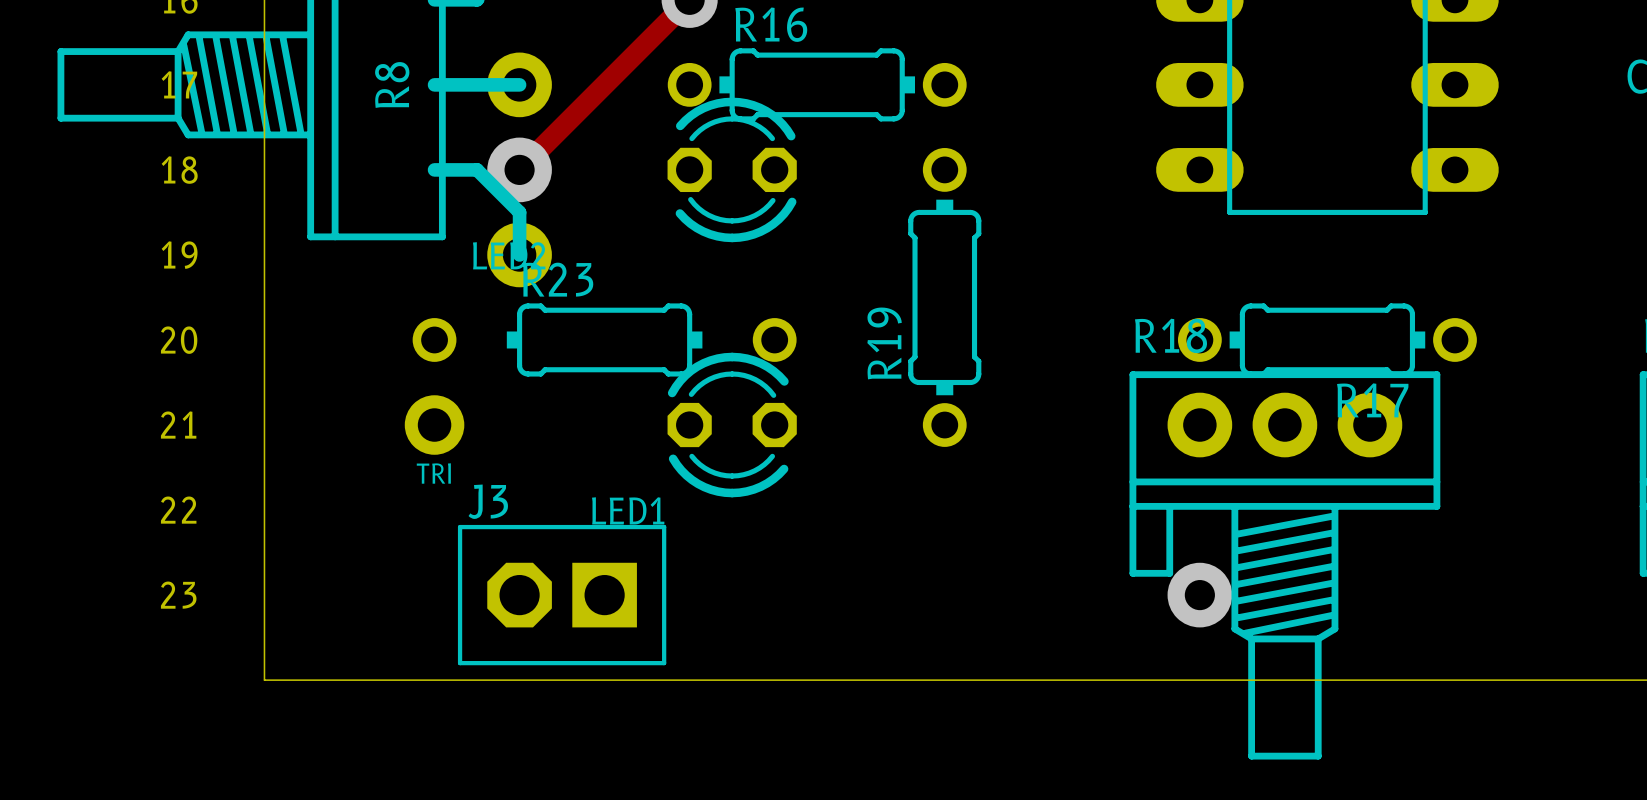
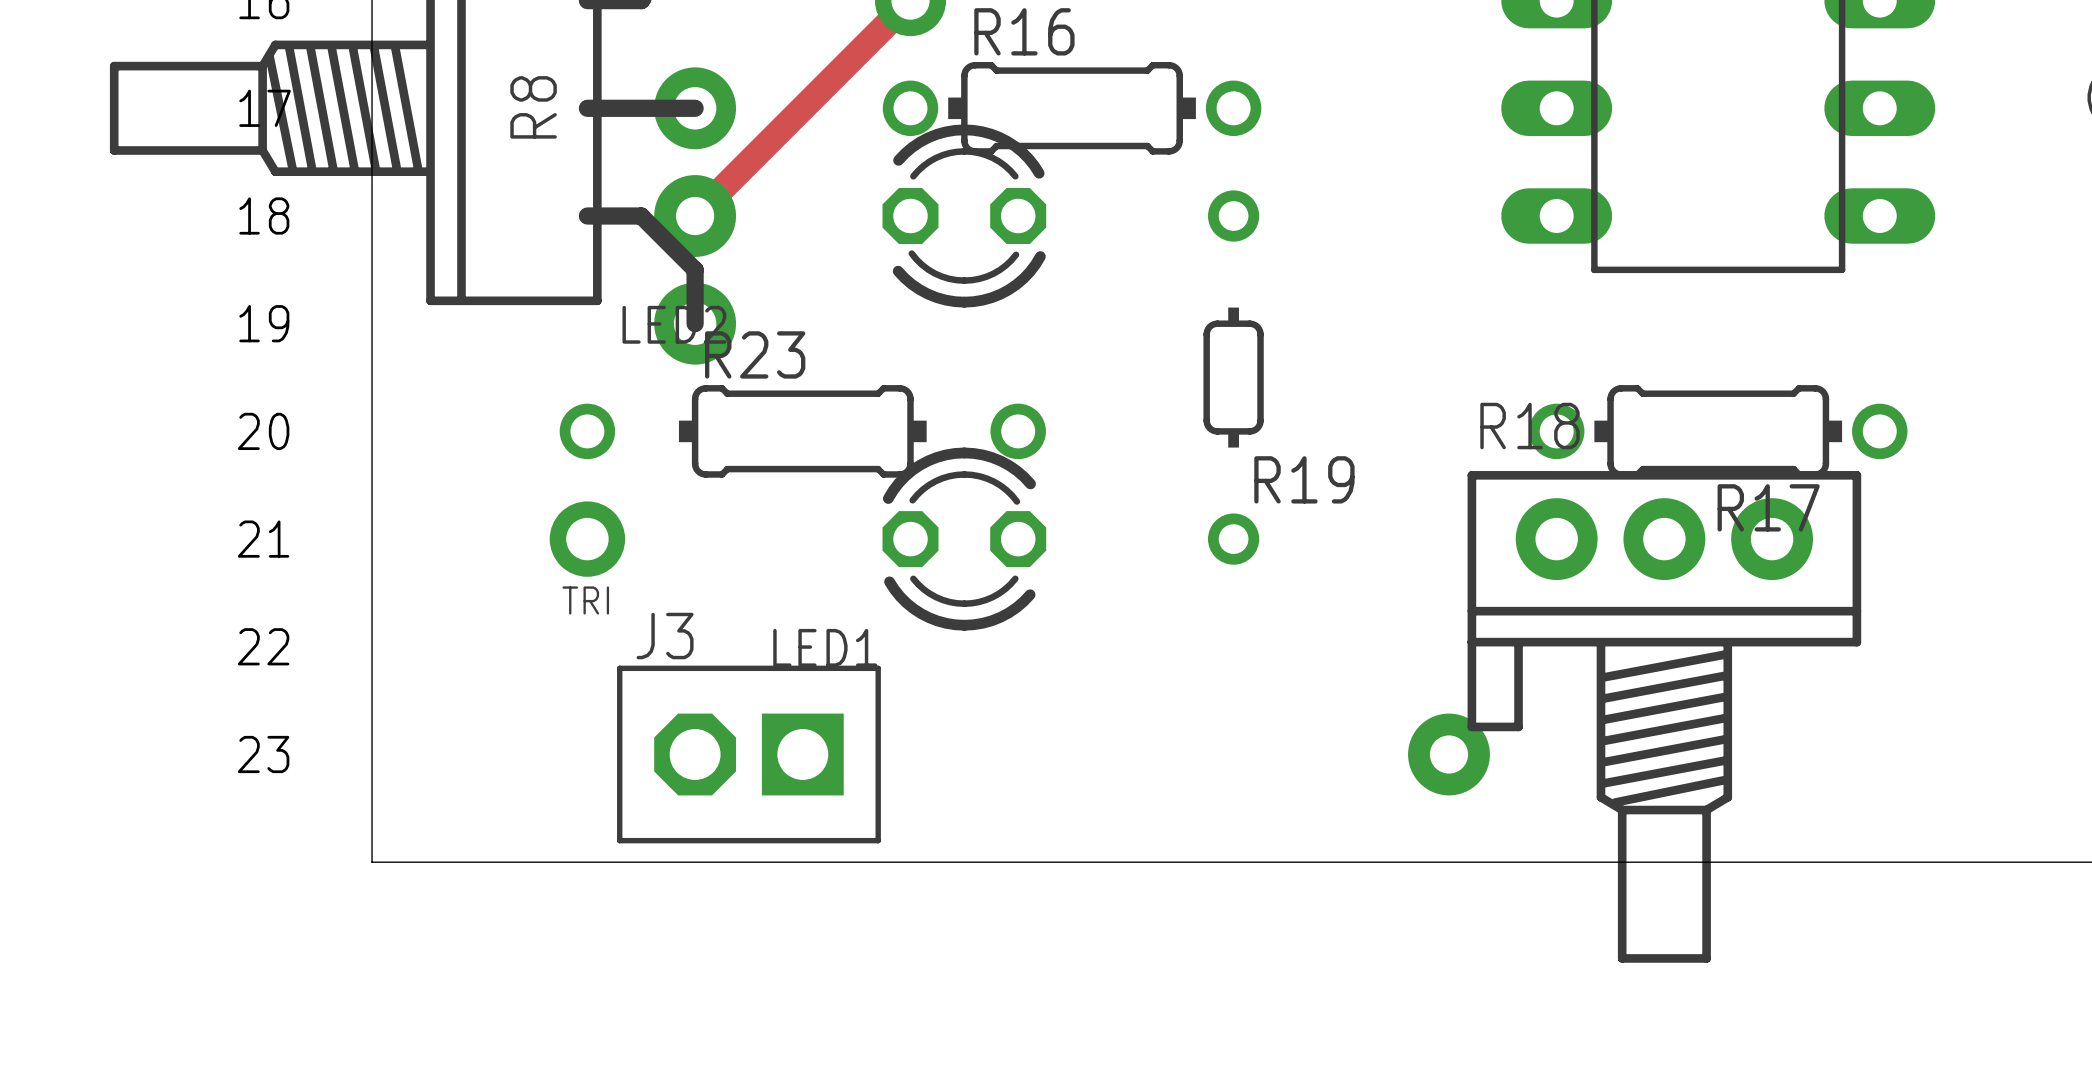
R19 footprint: [908, 148, 982, 447] -> [1203, 190, 1264, 565]
R19 name position: R19 (884, 343) -> R19 (1304, 479)
via position: (1199, 595) -> (1448, 754)

